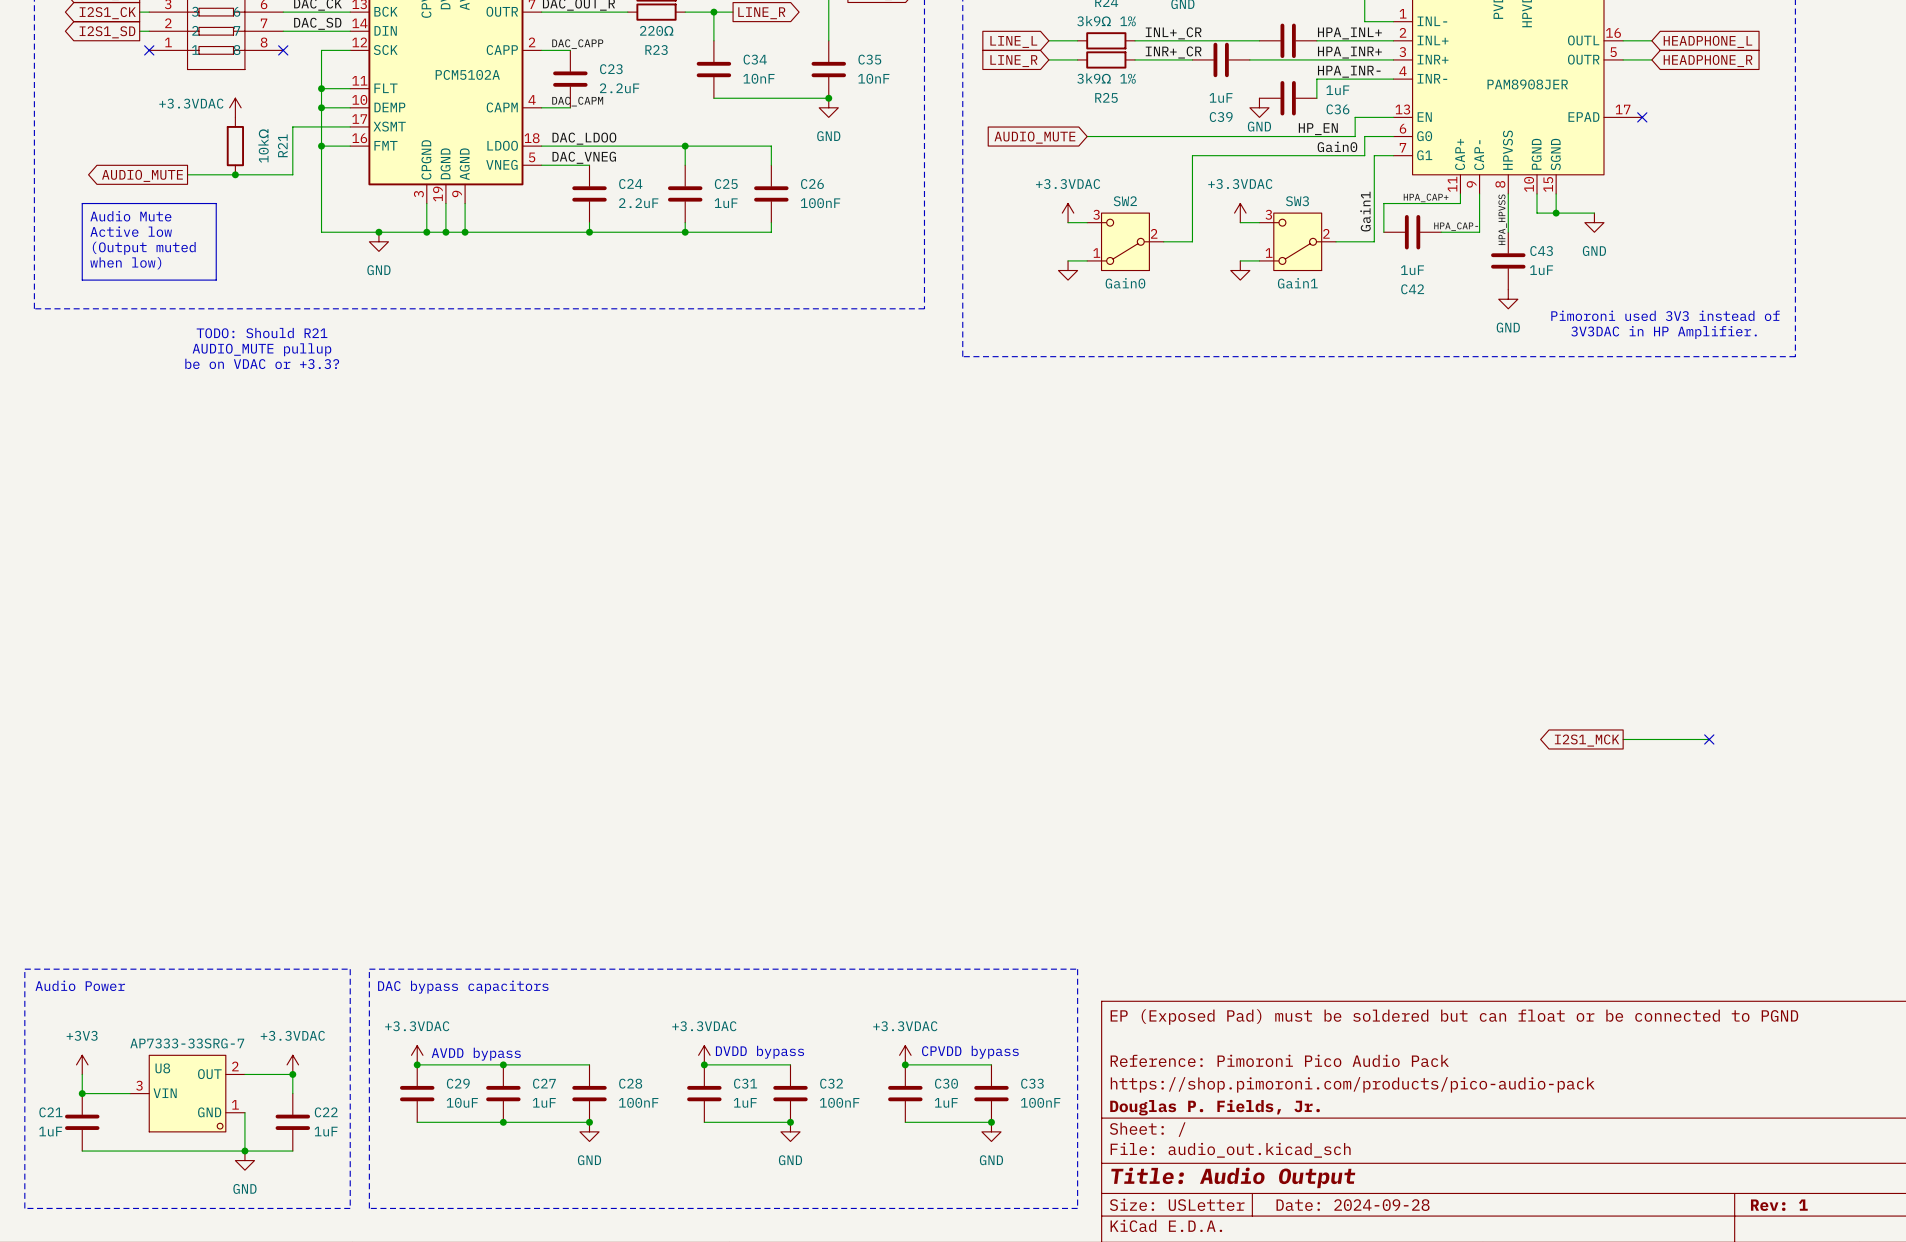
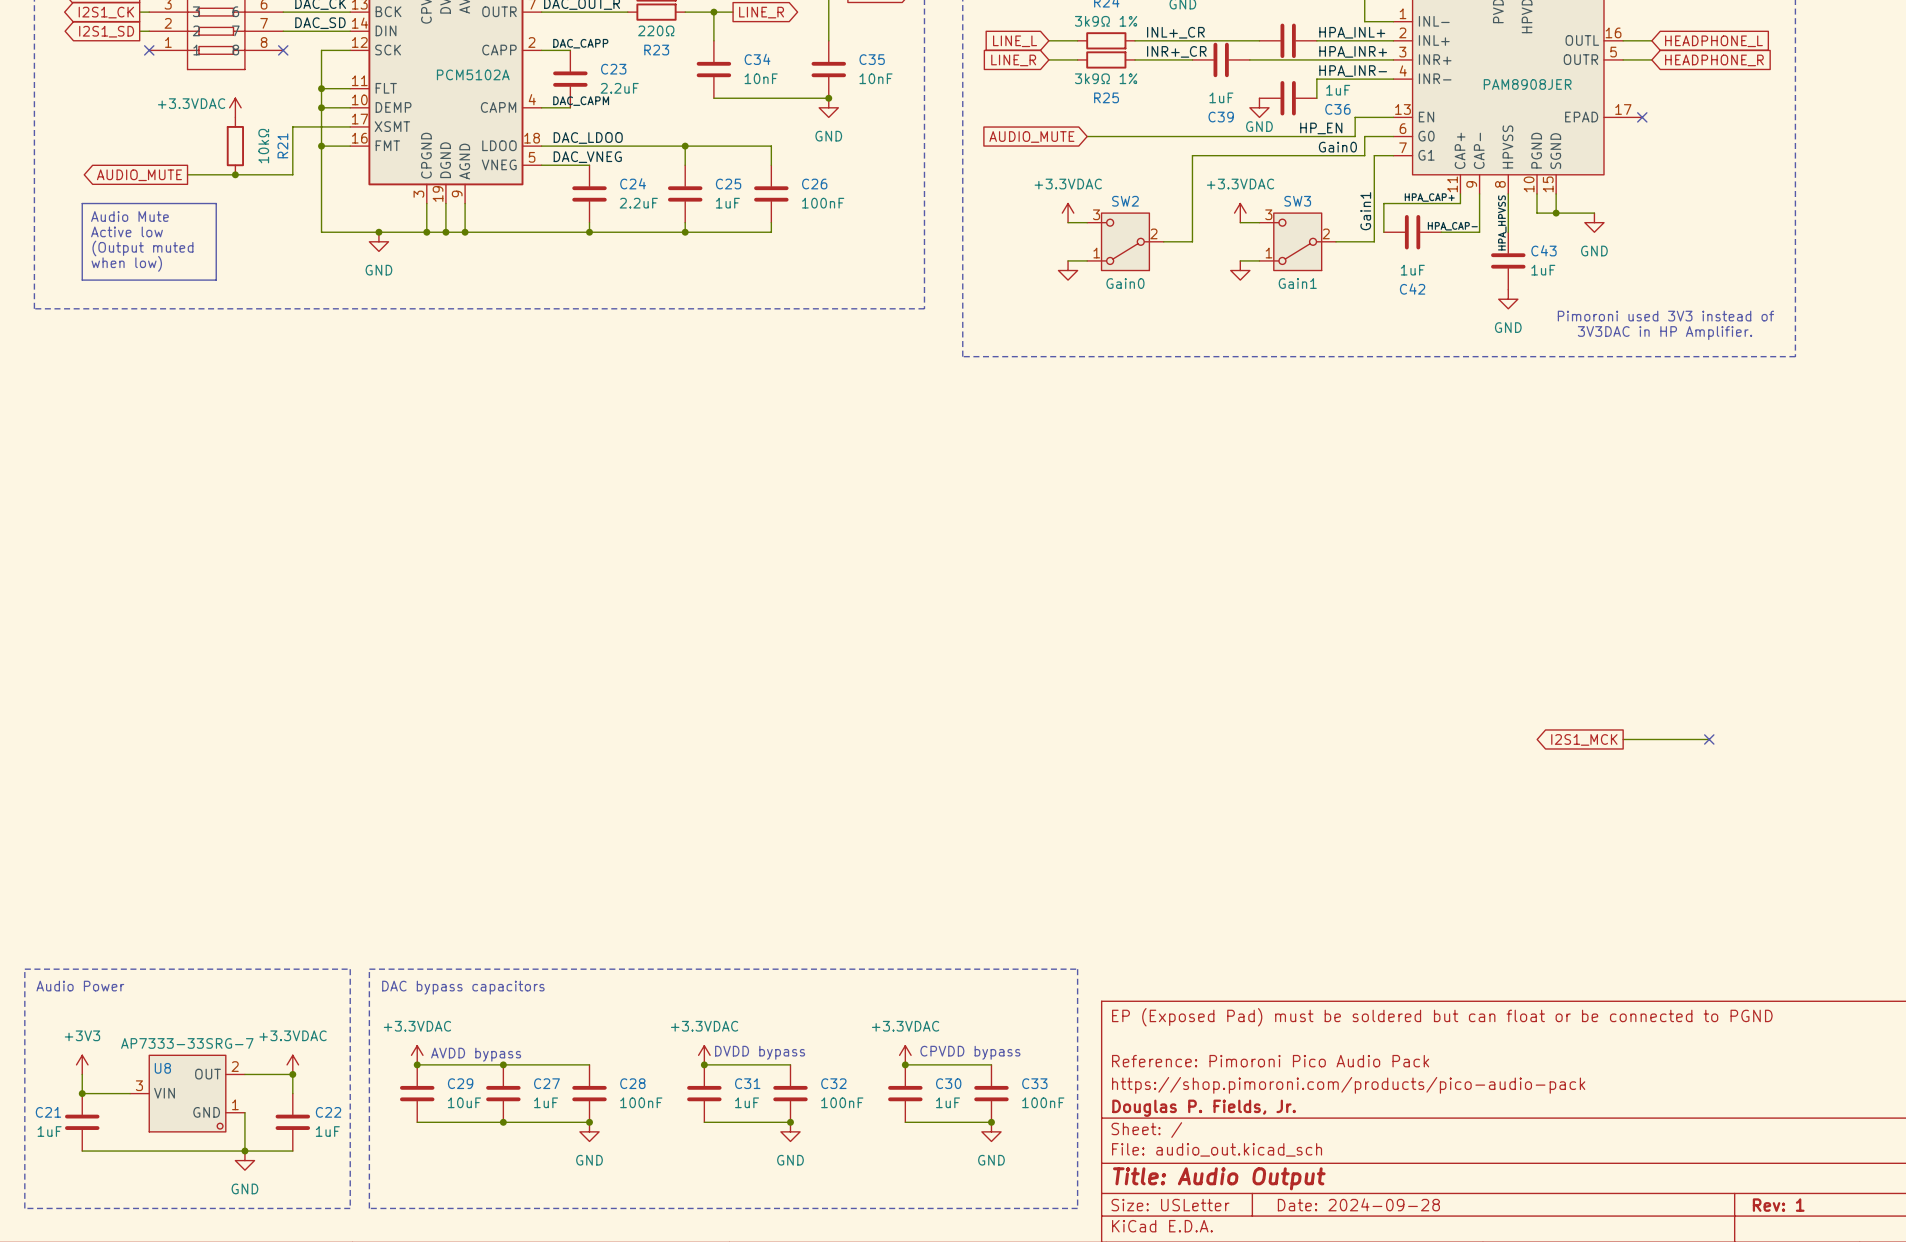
text: TODO: Should R21 (262, 333) -> none
text: AUDIO_MUTE pullup (261, 349) -> none
text: be on VDAC or +3.3? (262, 363) -> none

